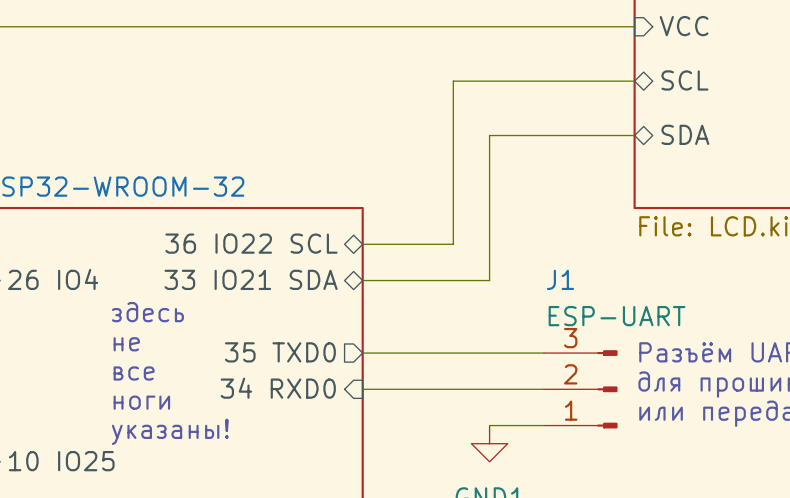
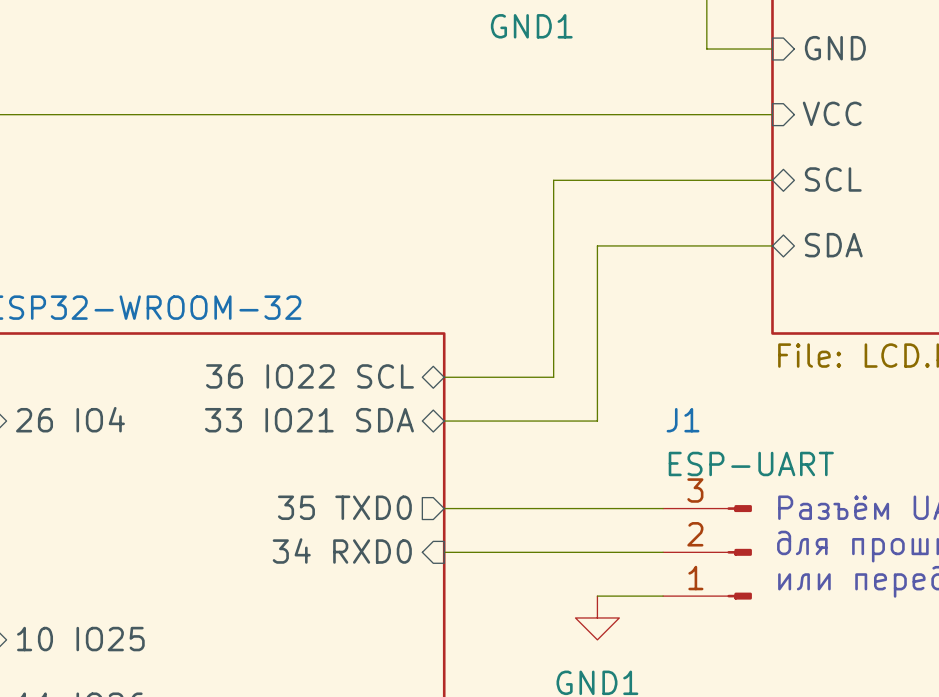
text: здесь (147, 312) -> none
text: не (126, 344) -> none
text: все (134, 373) -> none
text: ноги (141, 402) -> none
text: указаны! (170, 431) -> none

